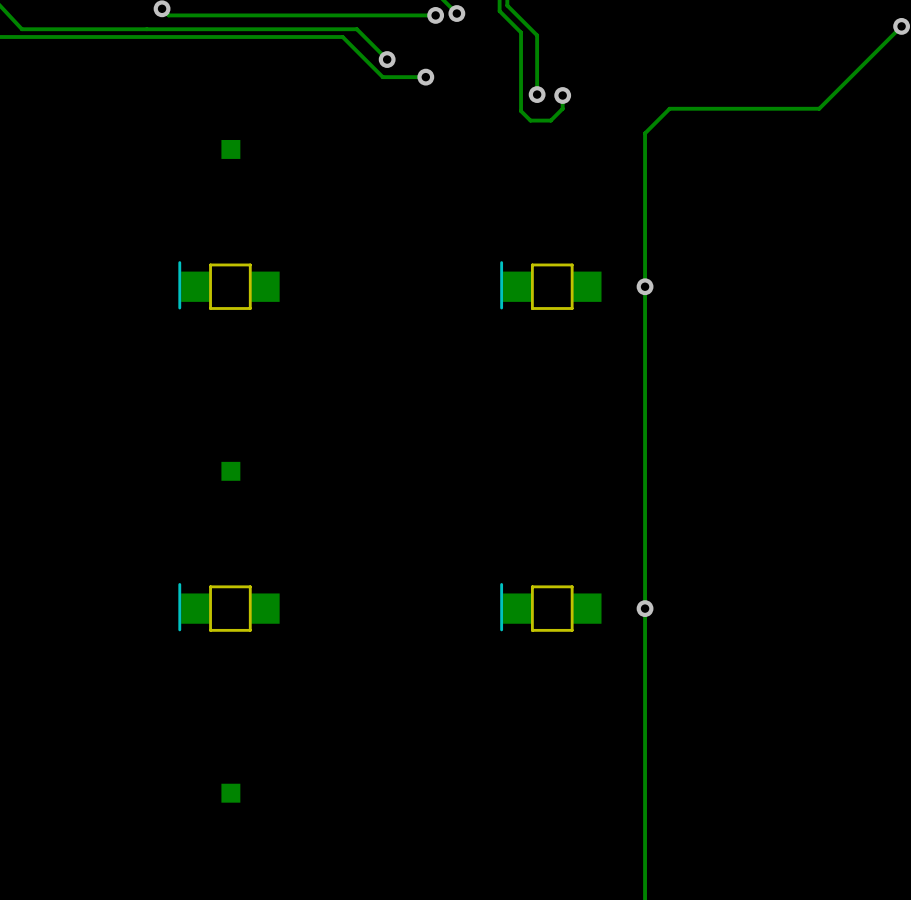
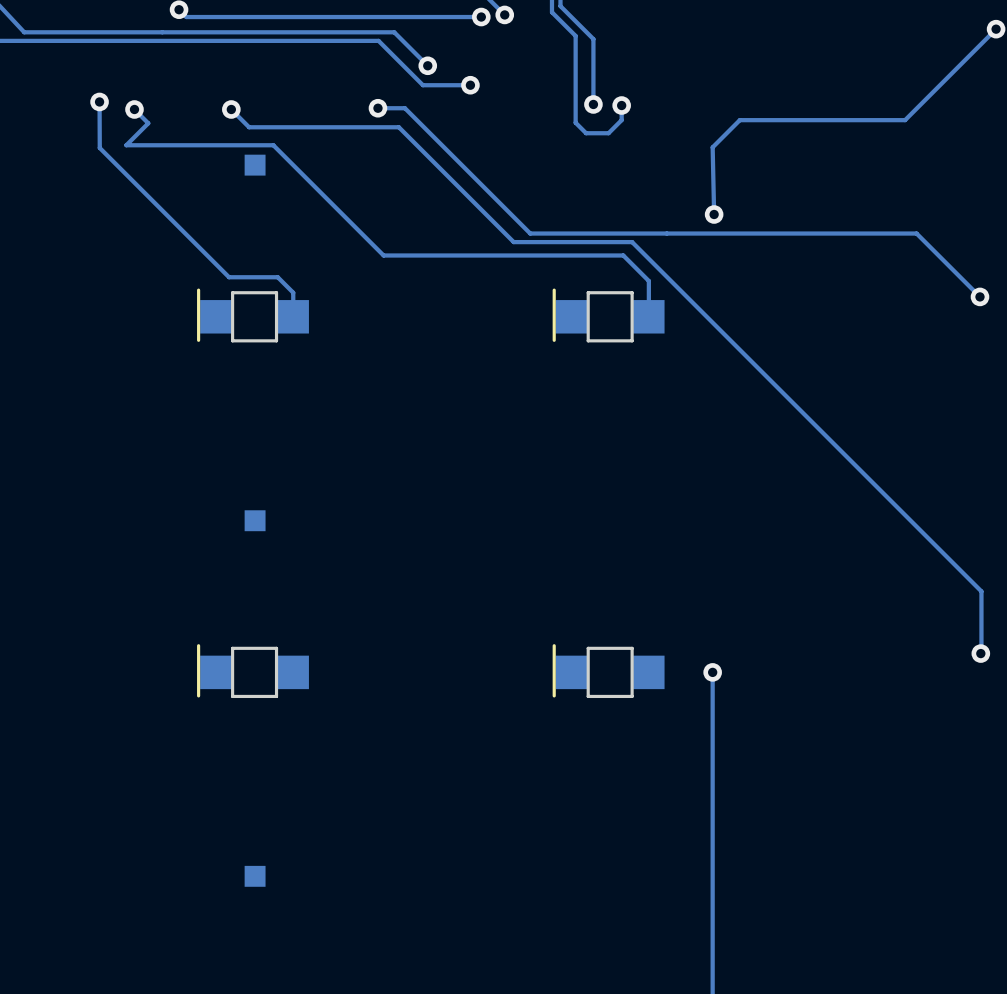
track: none -> (99, 102) (99, 147) (229, 277) (277, 277) (293, 292) (293, 316)
via: none -> (99, 101)
track: none -> (377, 108) (404, 108) (530, 233) (916, 233) (979, 296)
via: none -> (377, 108)
track: none -> (134, 109) (148, 123) (126, 145) (273, 145) (383, 255) (623, 255) (648, 281) (648, 316)
via: none -> (134, 109)
track: none -> (231, 109) (249, 127) (398, 127) (513, 242) (632, 242) (981, 591) (980, 653)
via: none -> (231, 109)
track: (645, 133) (645, 608) -> (712, 147) (714, 214)
via: none -> (979, 296)
via position: (645, 286) -> (714, 214)
via: none -> (980, 653)

